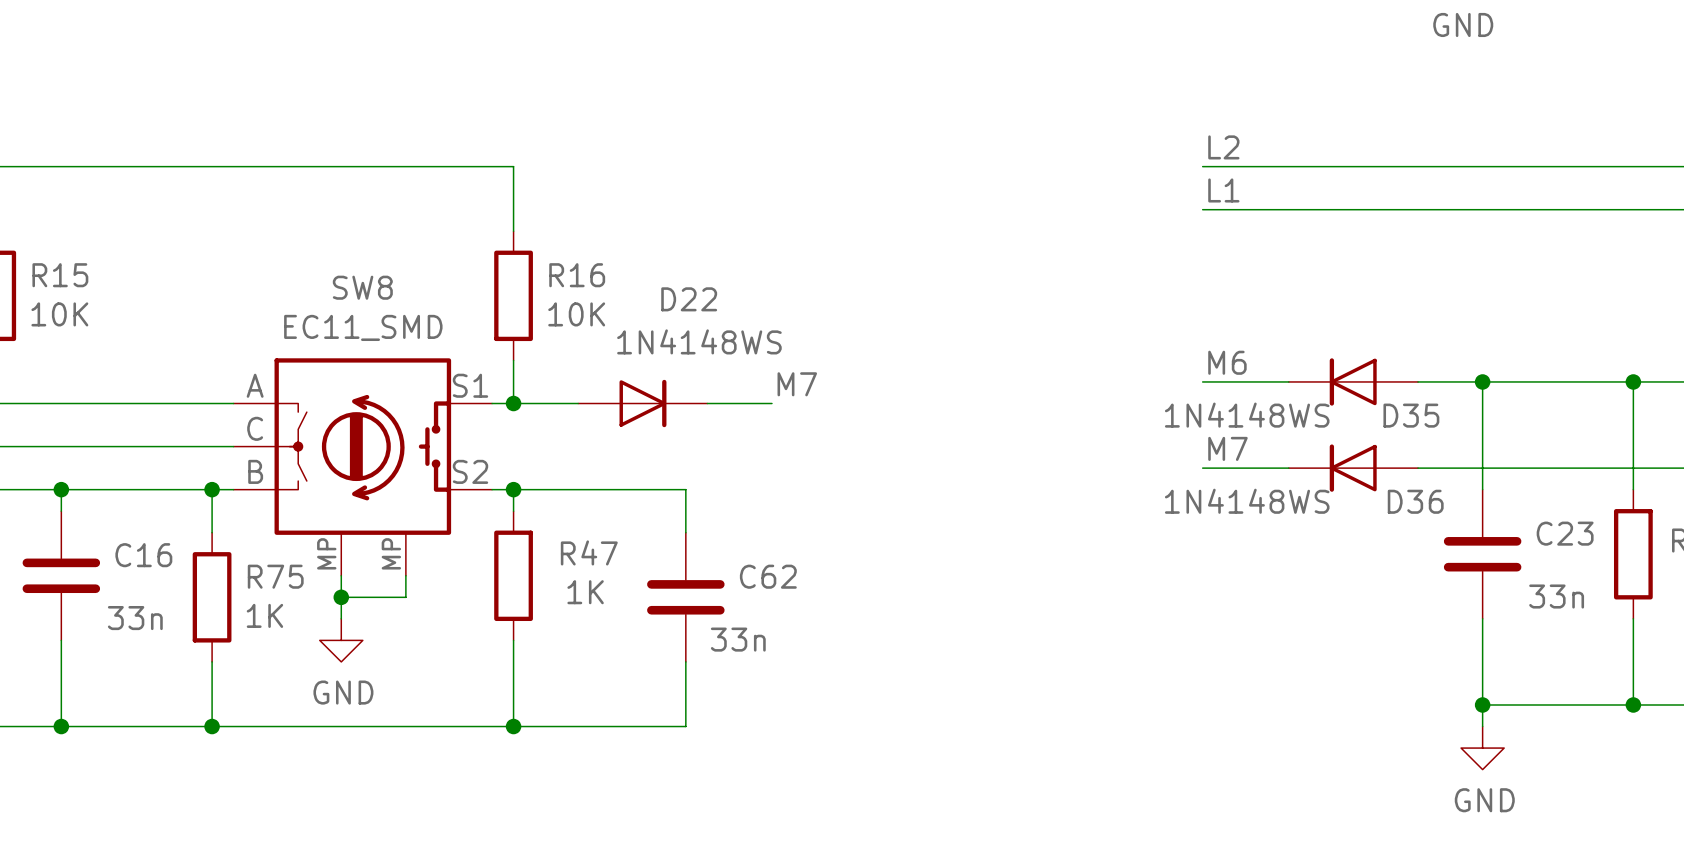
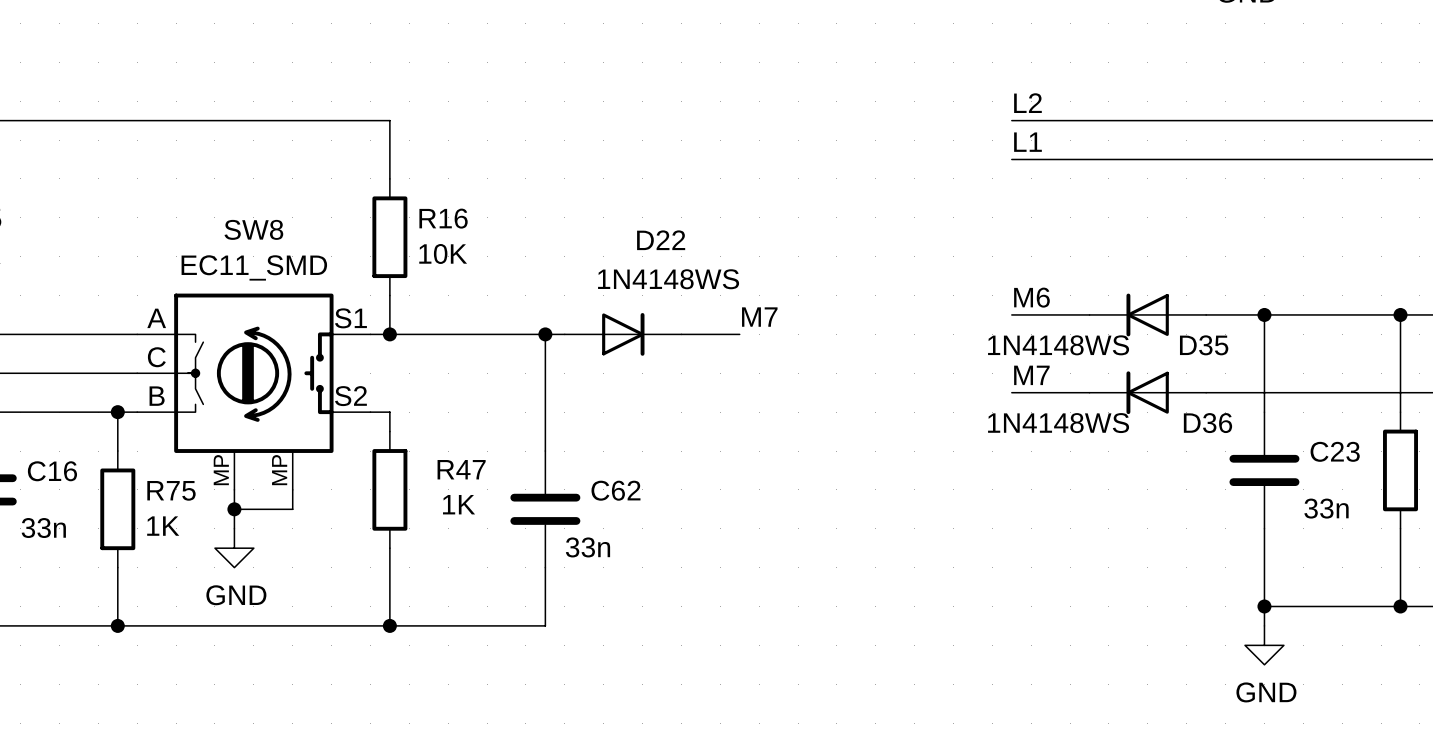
label position: M7 (797, 384) -> M7 (759, 317)
D22 position: (642, 403) -> (623, 334)
junction: none -> (545, 334)
wire: none -> (681, 334) (739, 334)
wire: (513, 489) (685, 489) -> (545, 334) (545, 412)
junction: (513, 489) -> none

